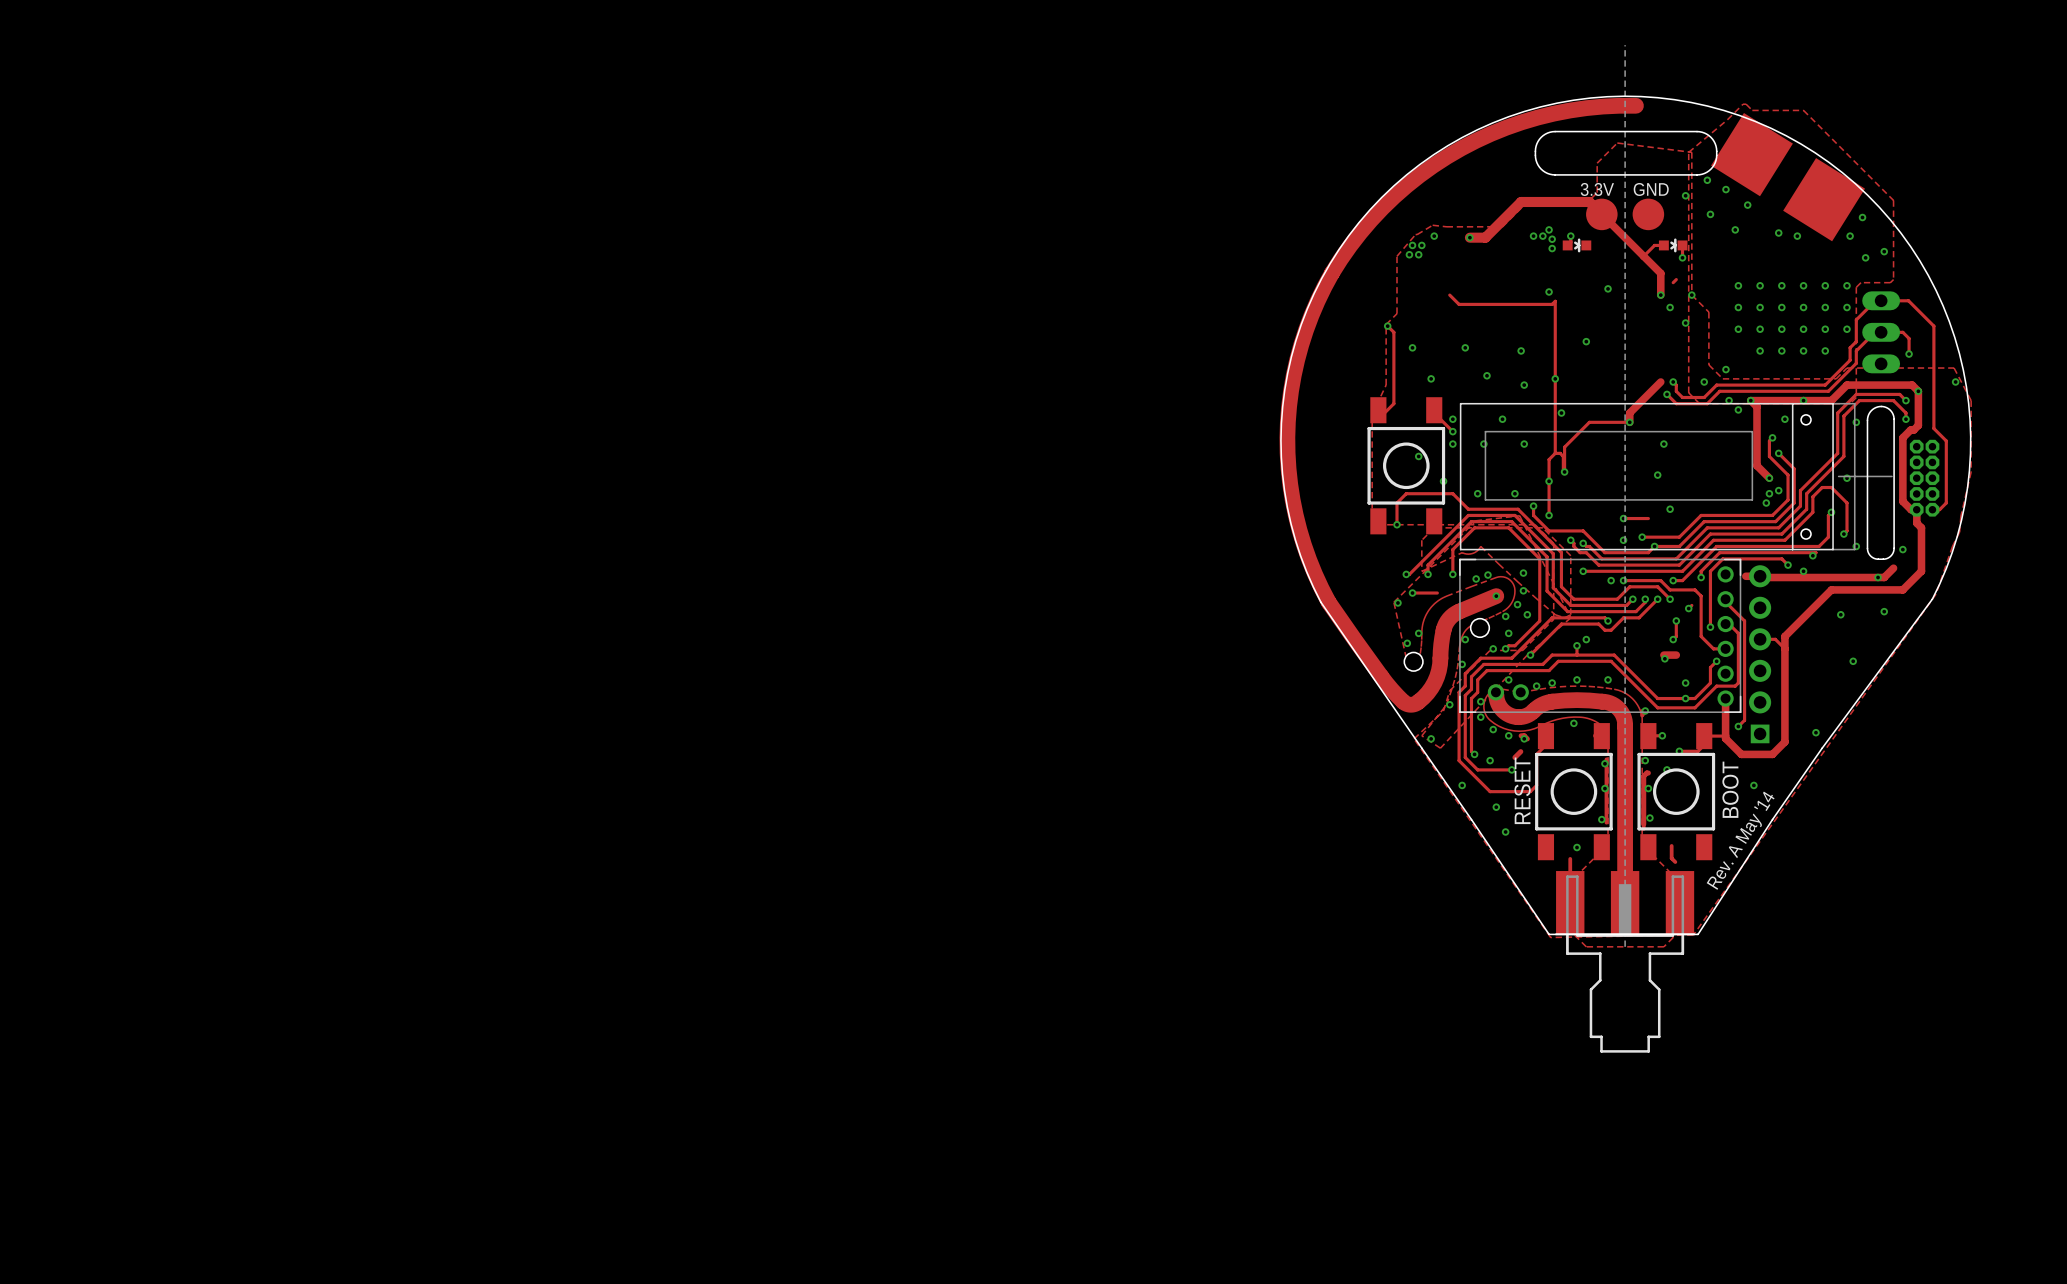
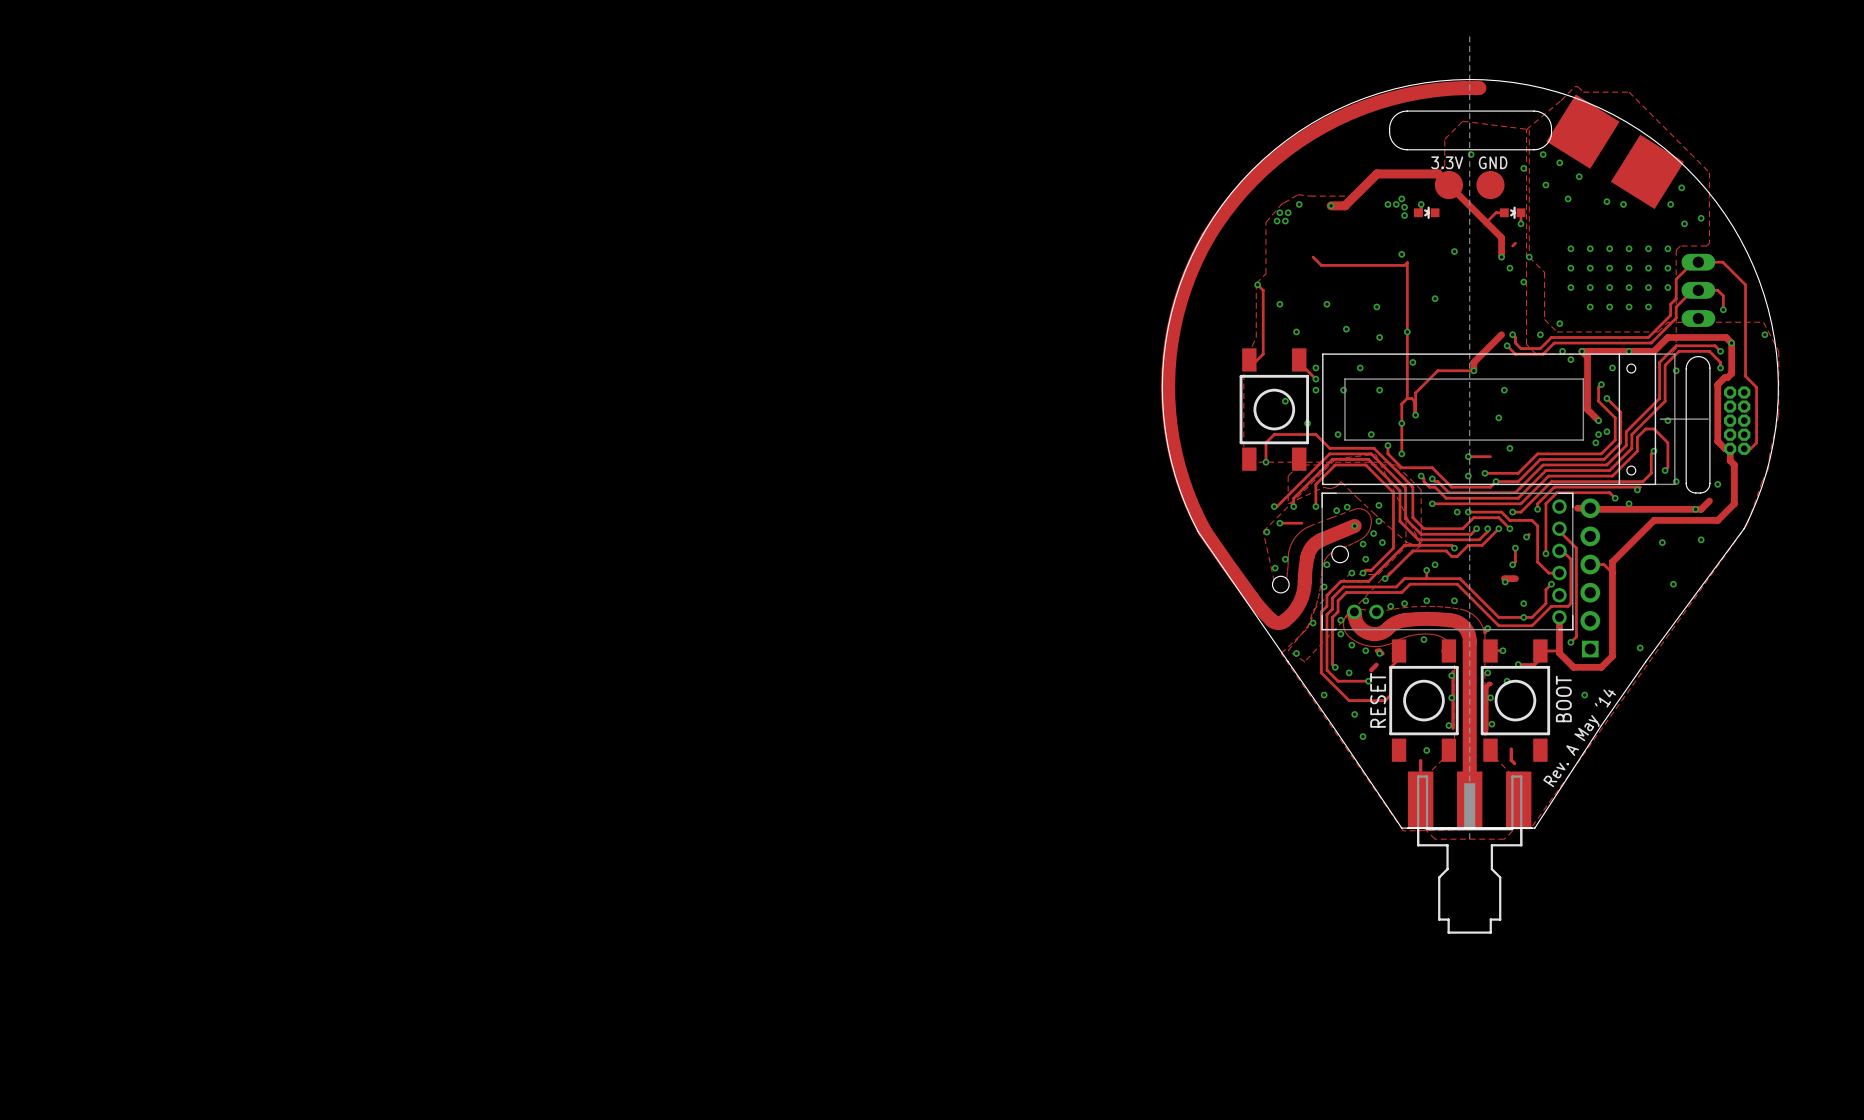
via: none -> (1471, 154)
text rotation: 0° (1740, 840) -> 2° clockwise (1579, 738)

